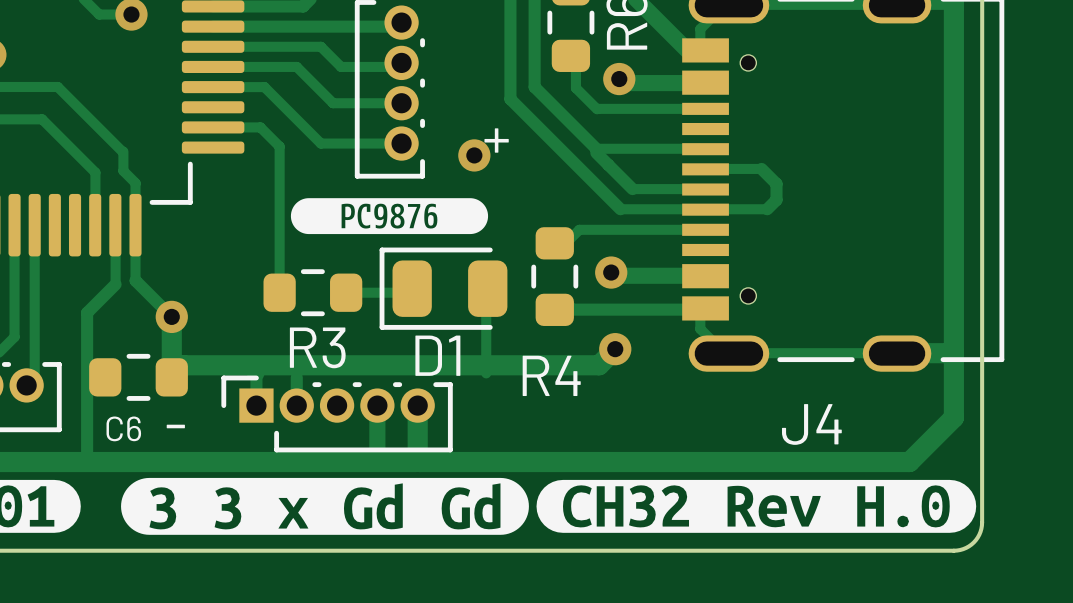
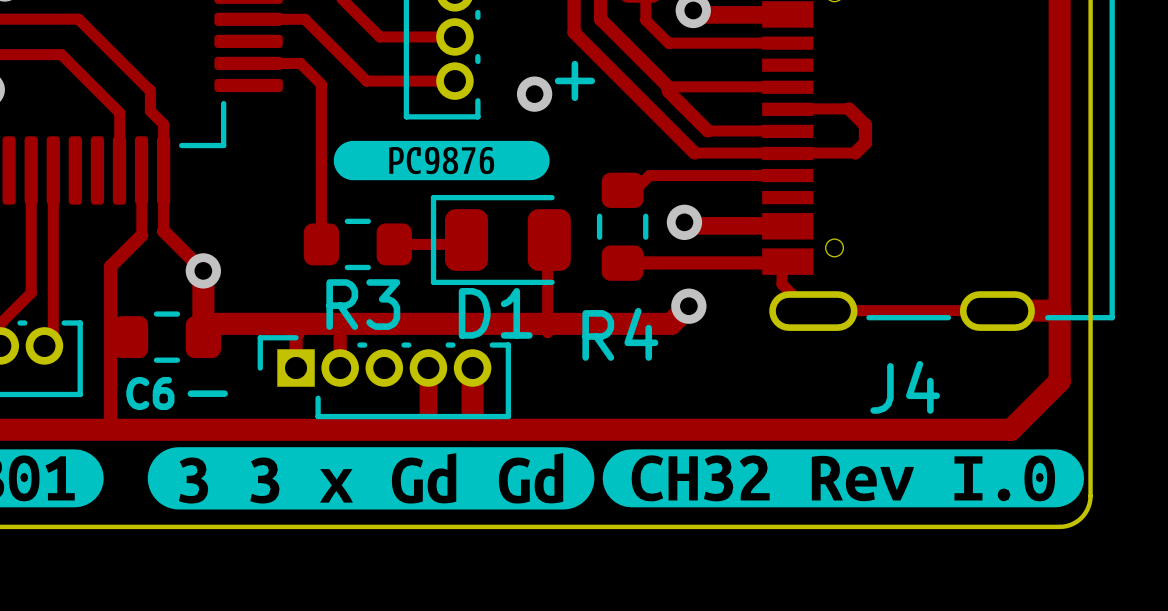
drawing shape: [536, 479, 977, 533] -> [602, 449, 1085, 508]

